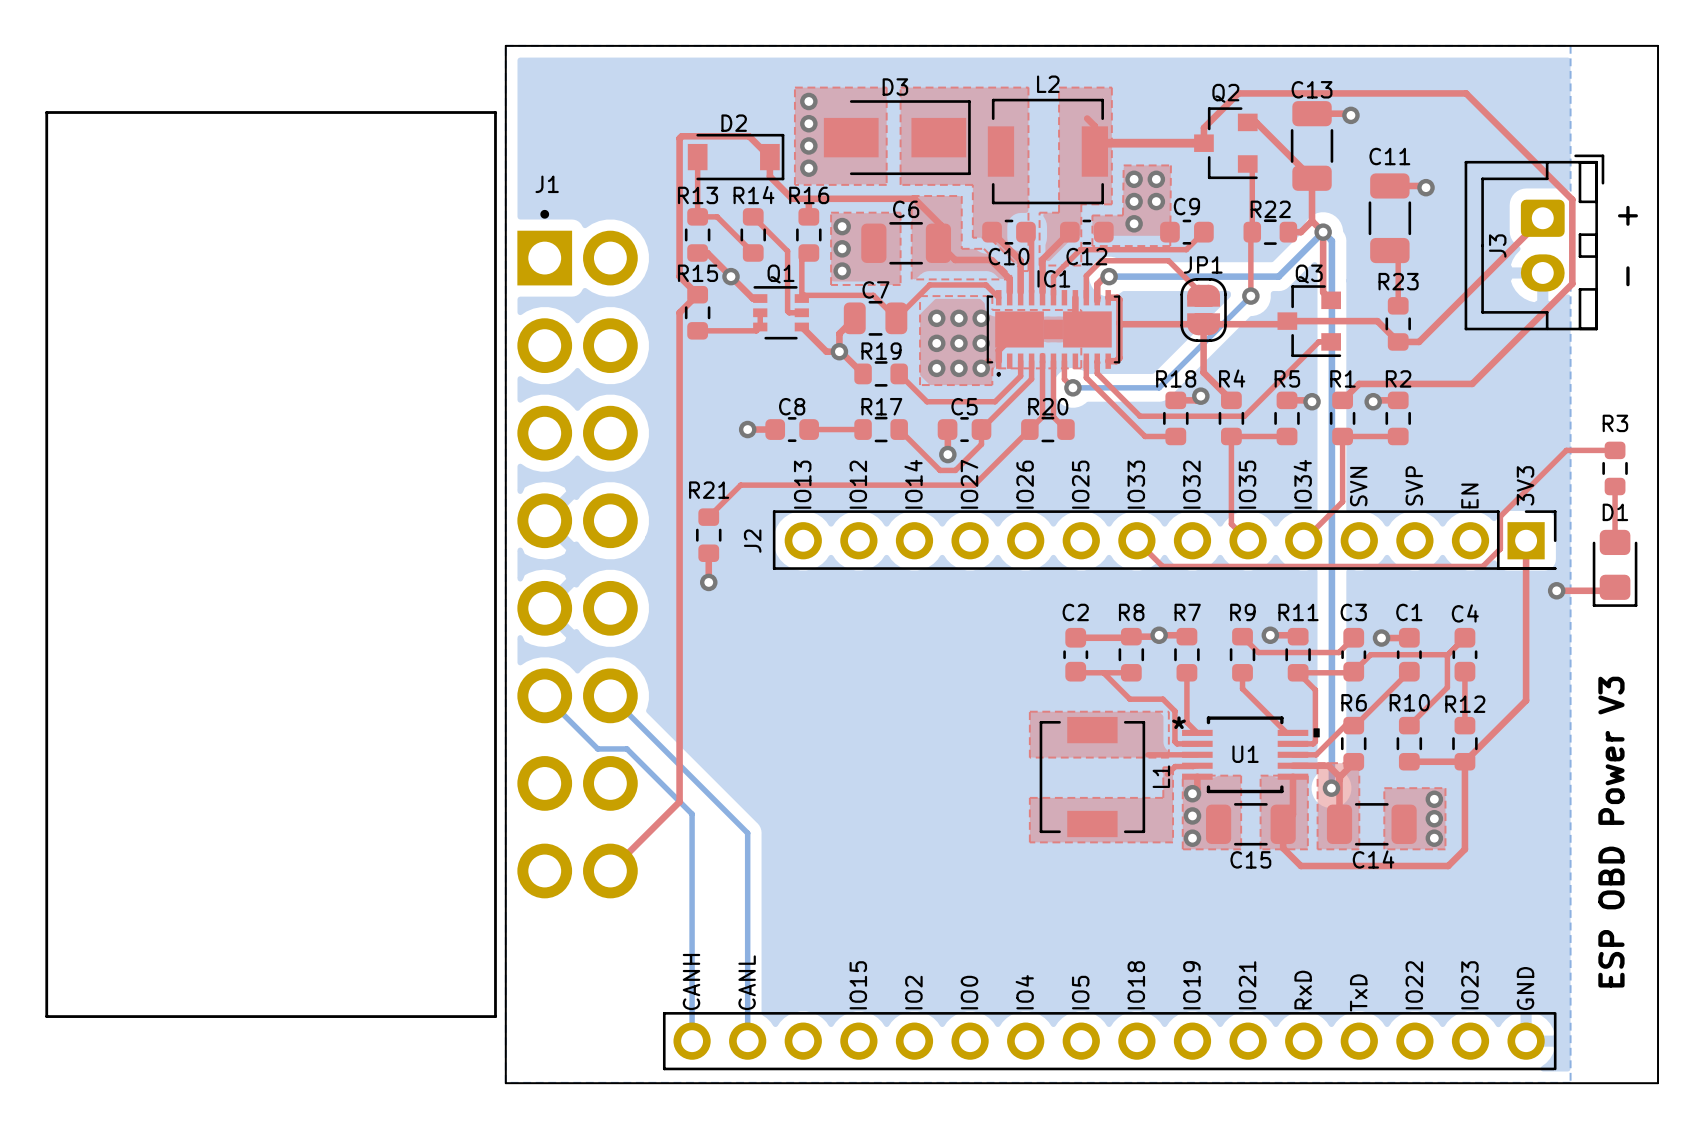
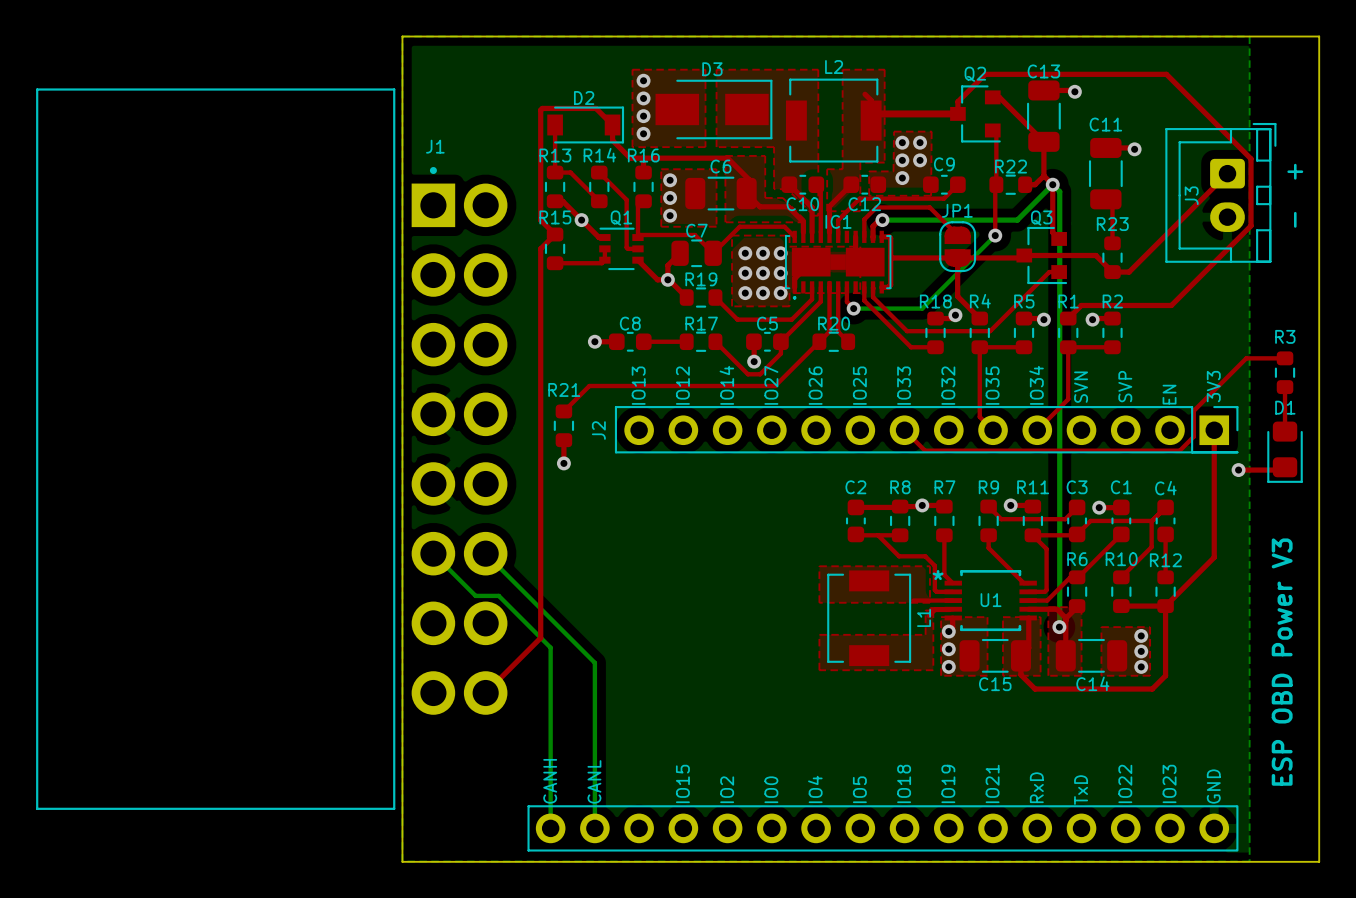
U1 footprint: [1182, 716, 1320, 794] -> [944, 570, 1037, 632]

